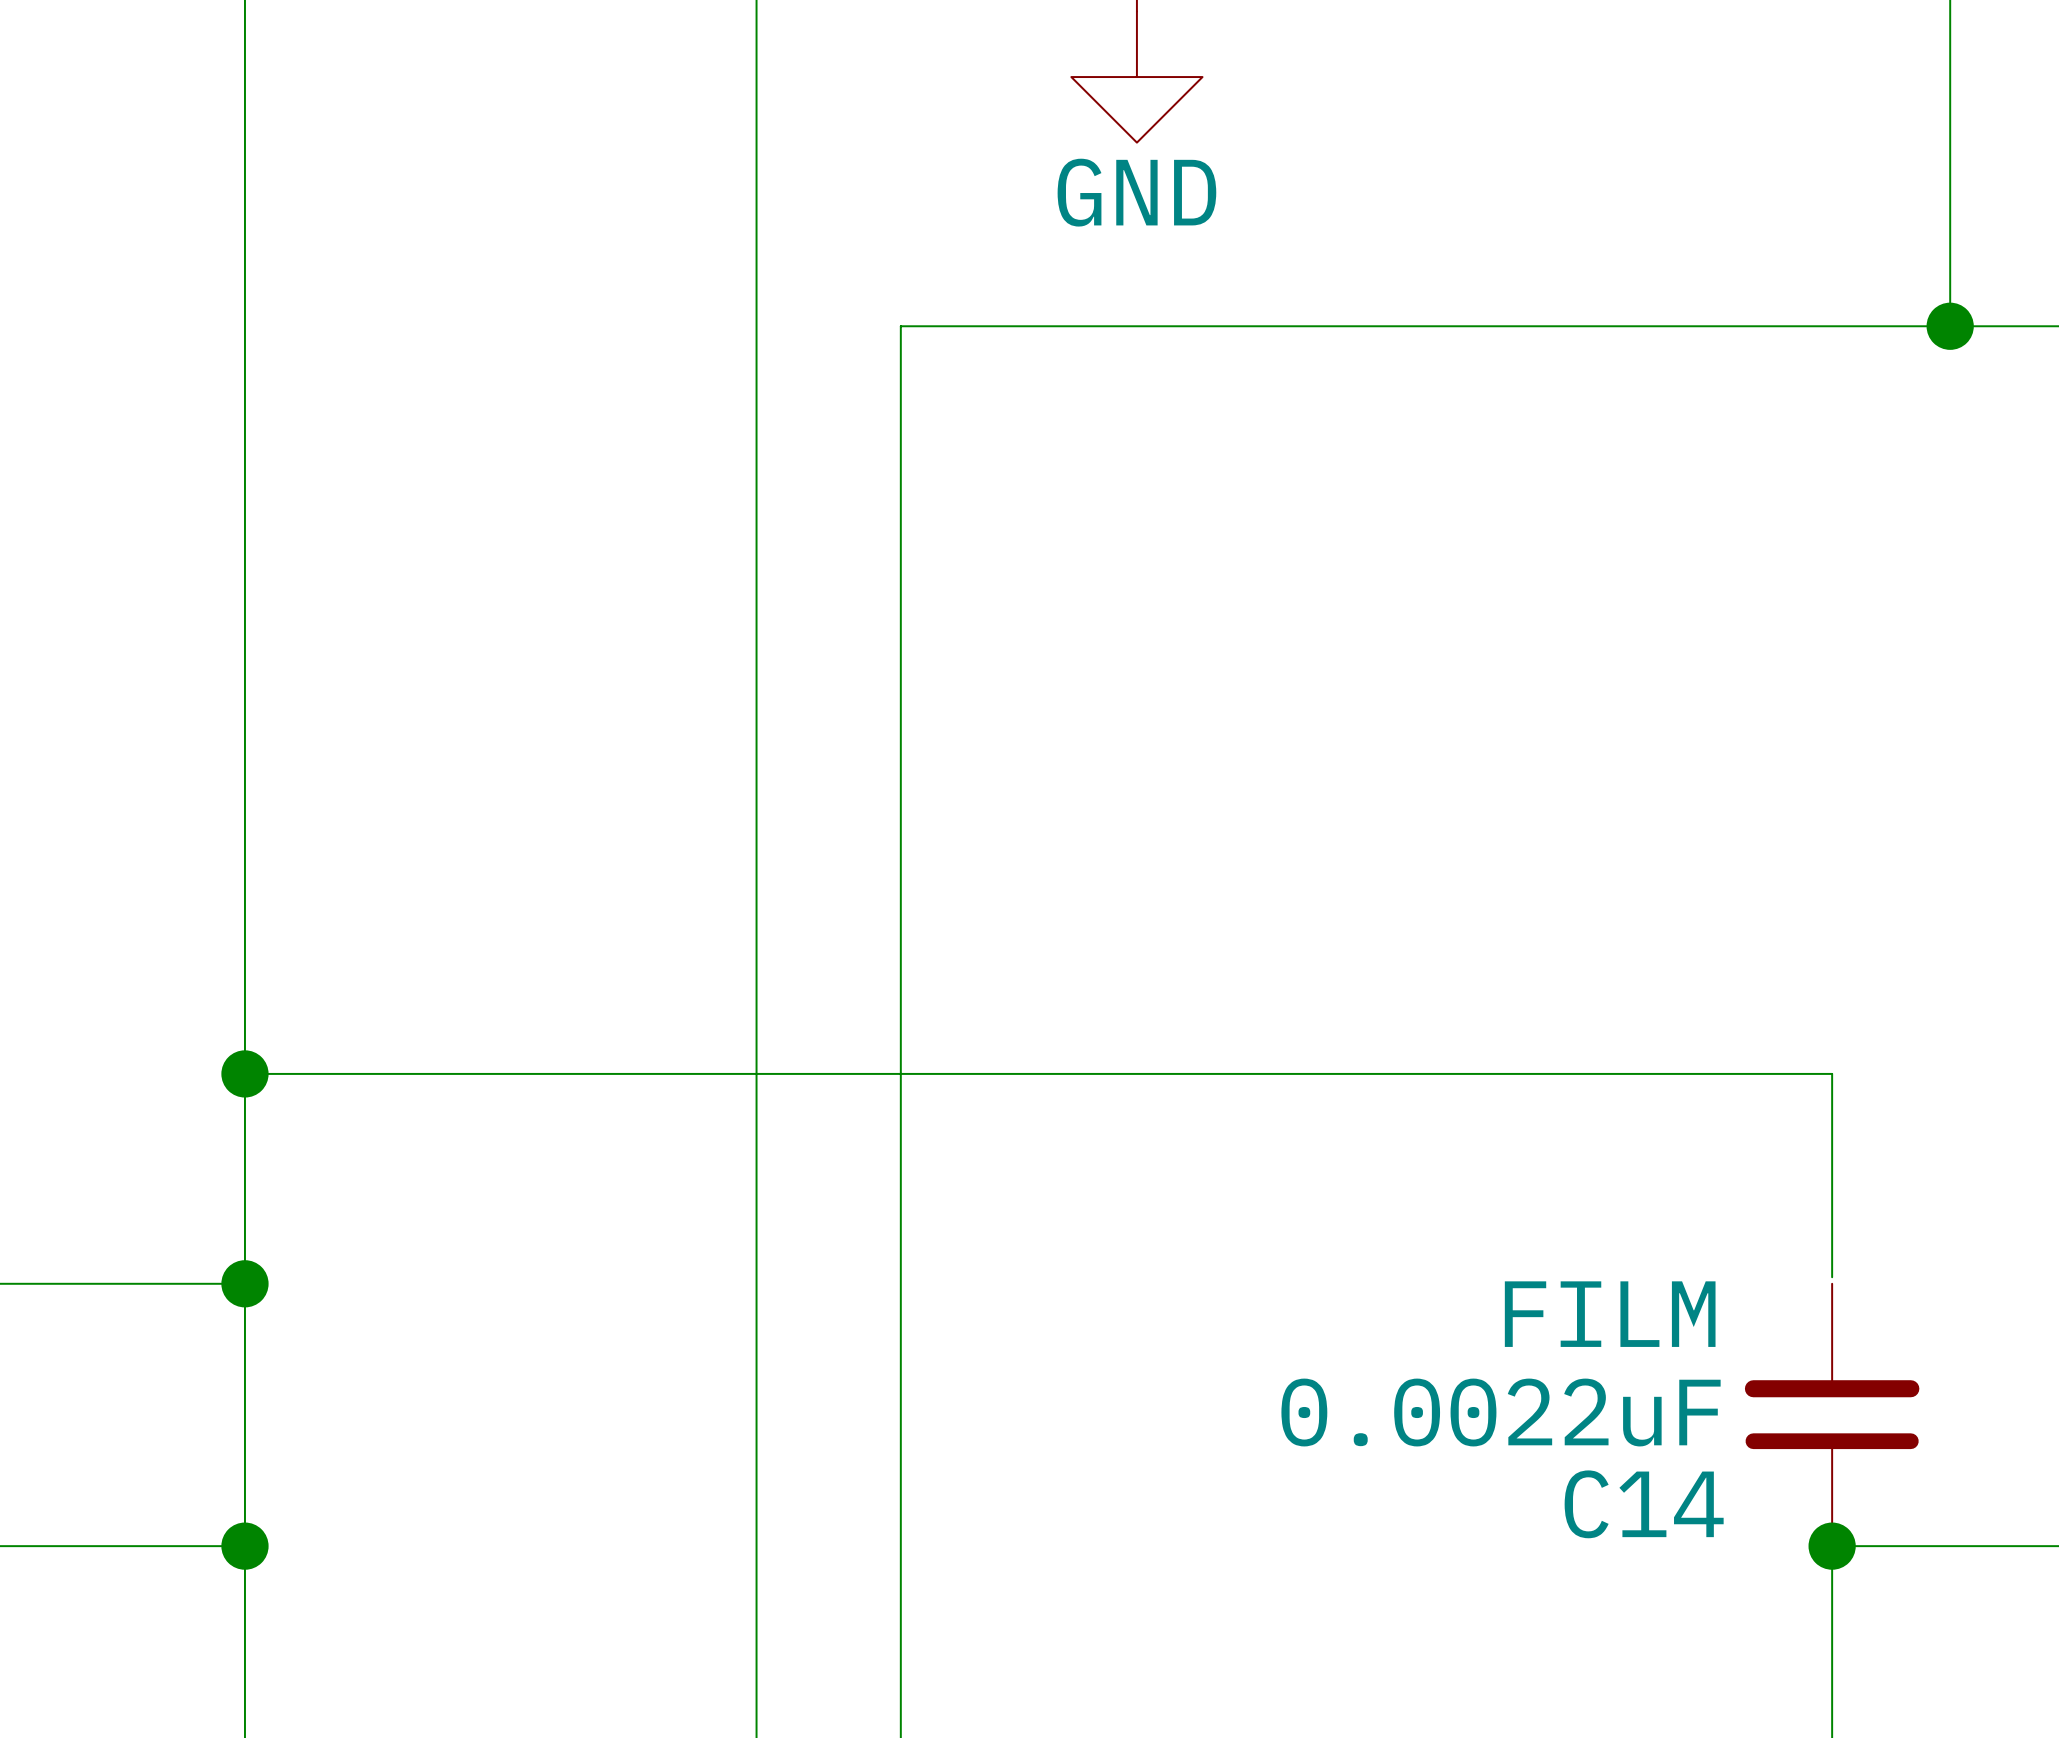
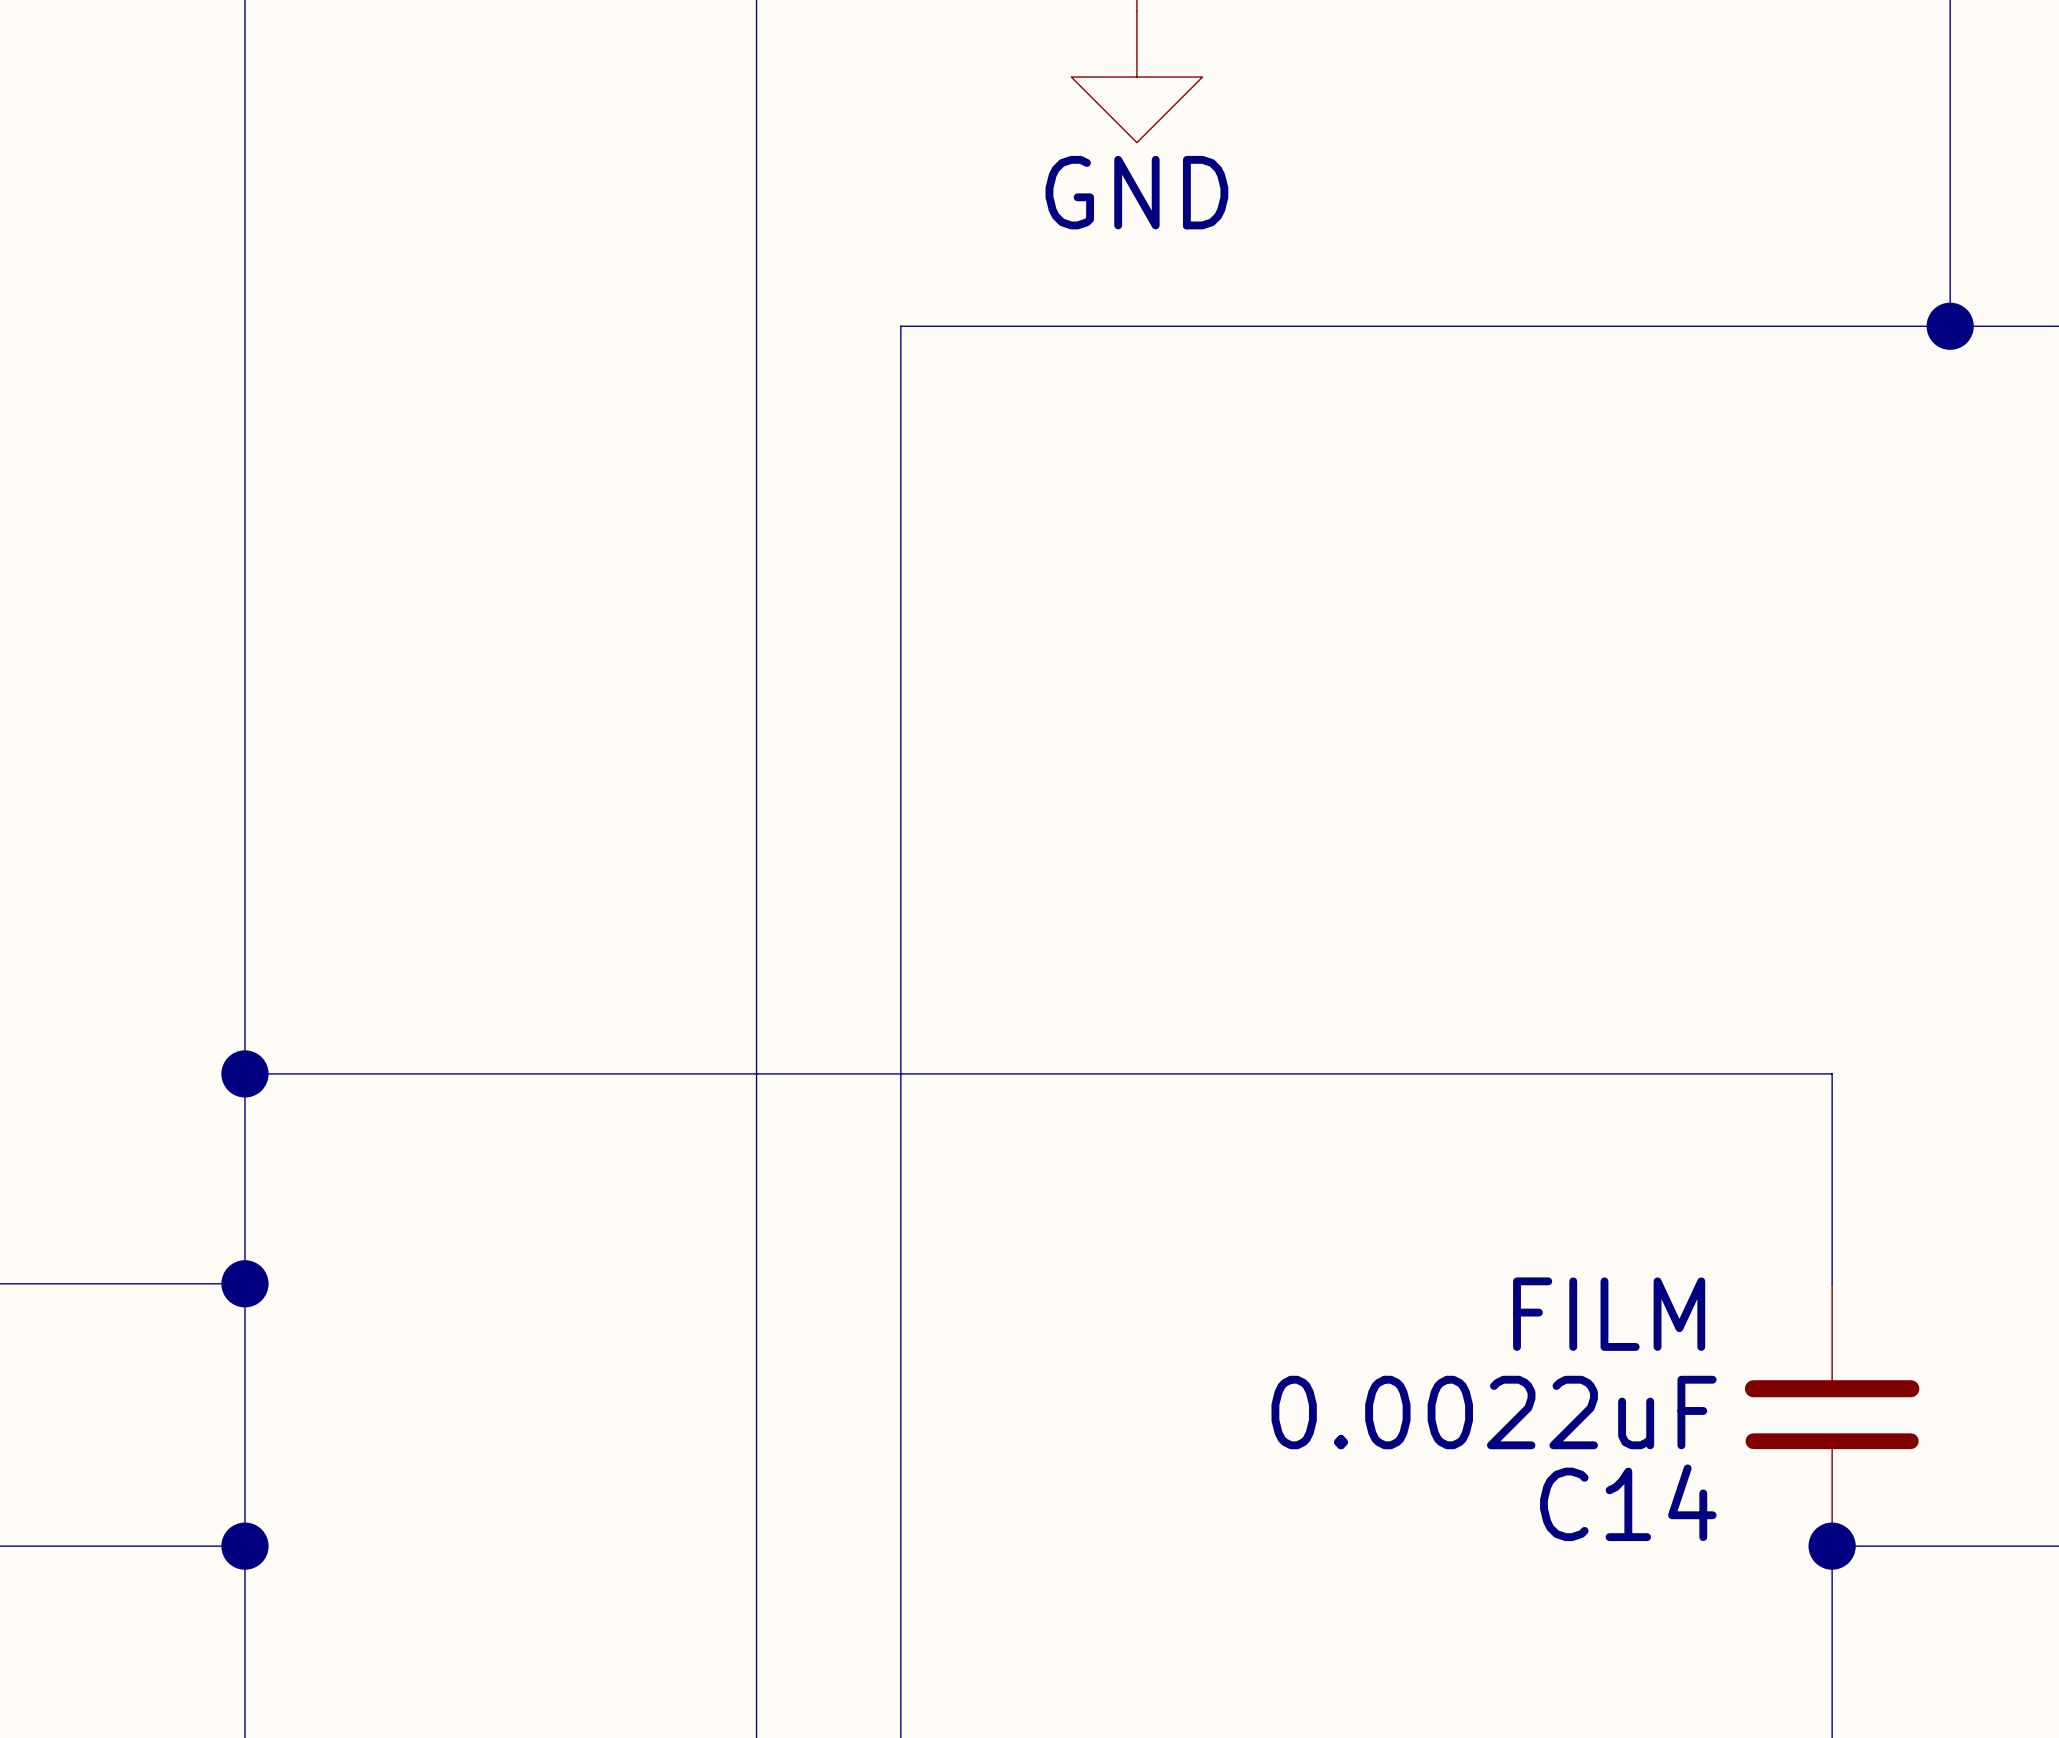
wire: none -> (1832, 1277) (1832, 1283)

